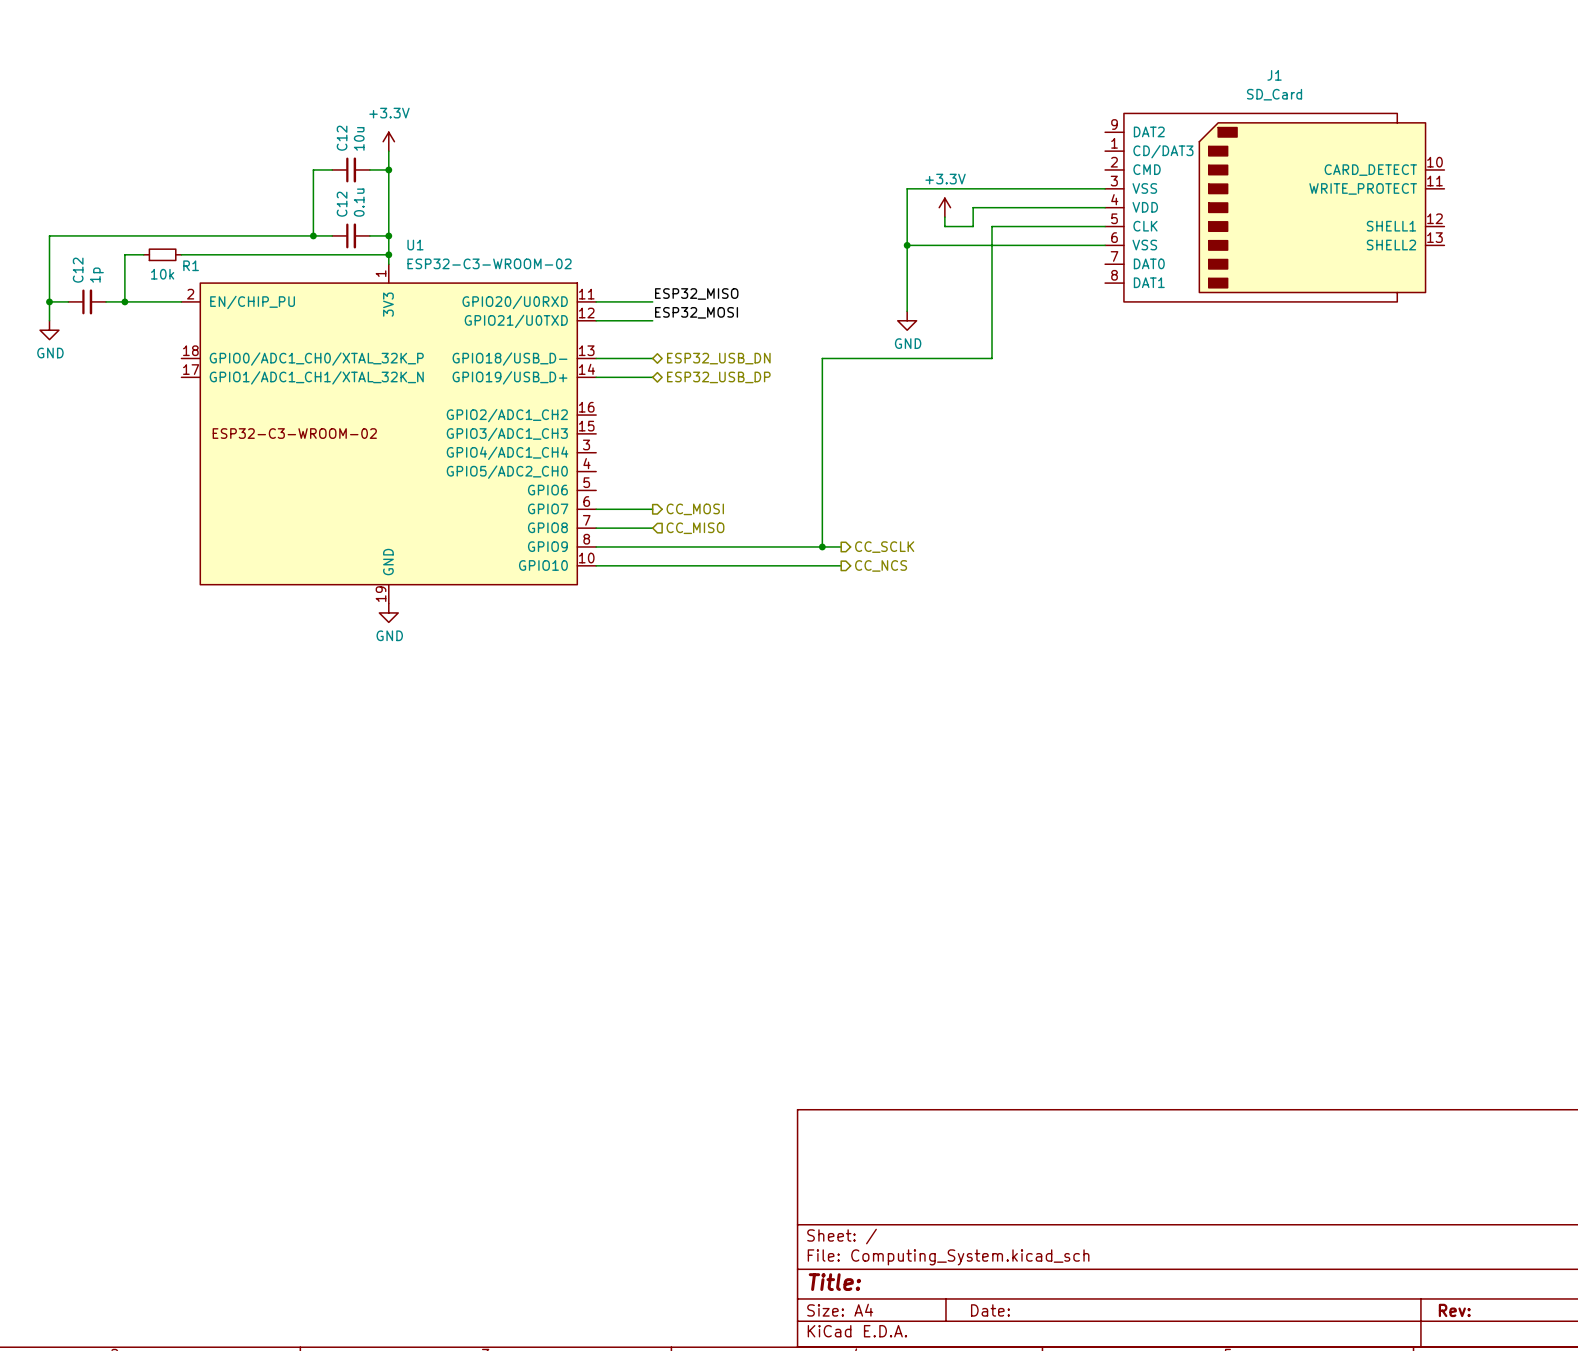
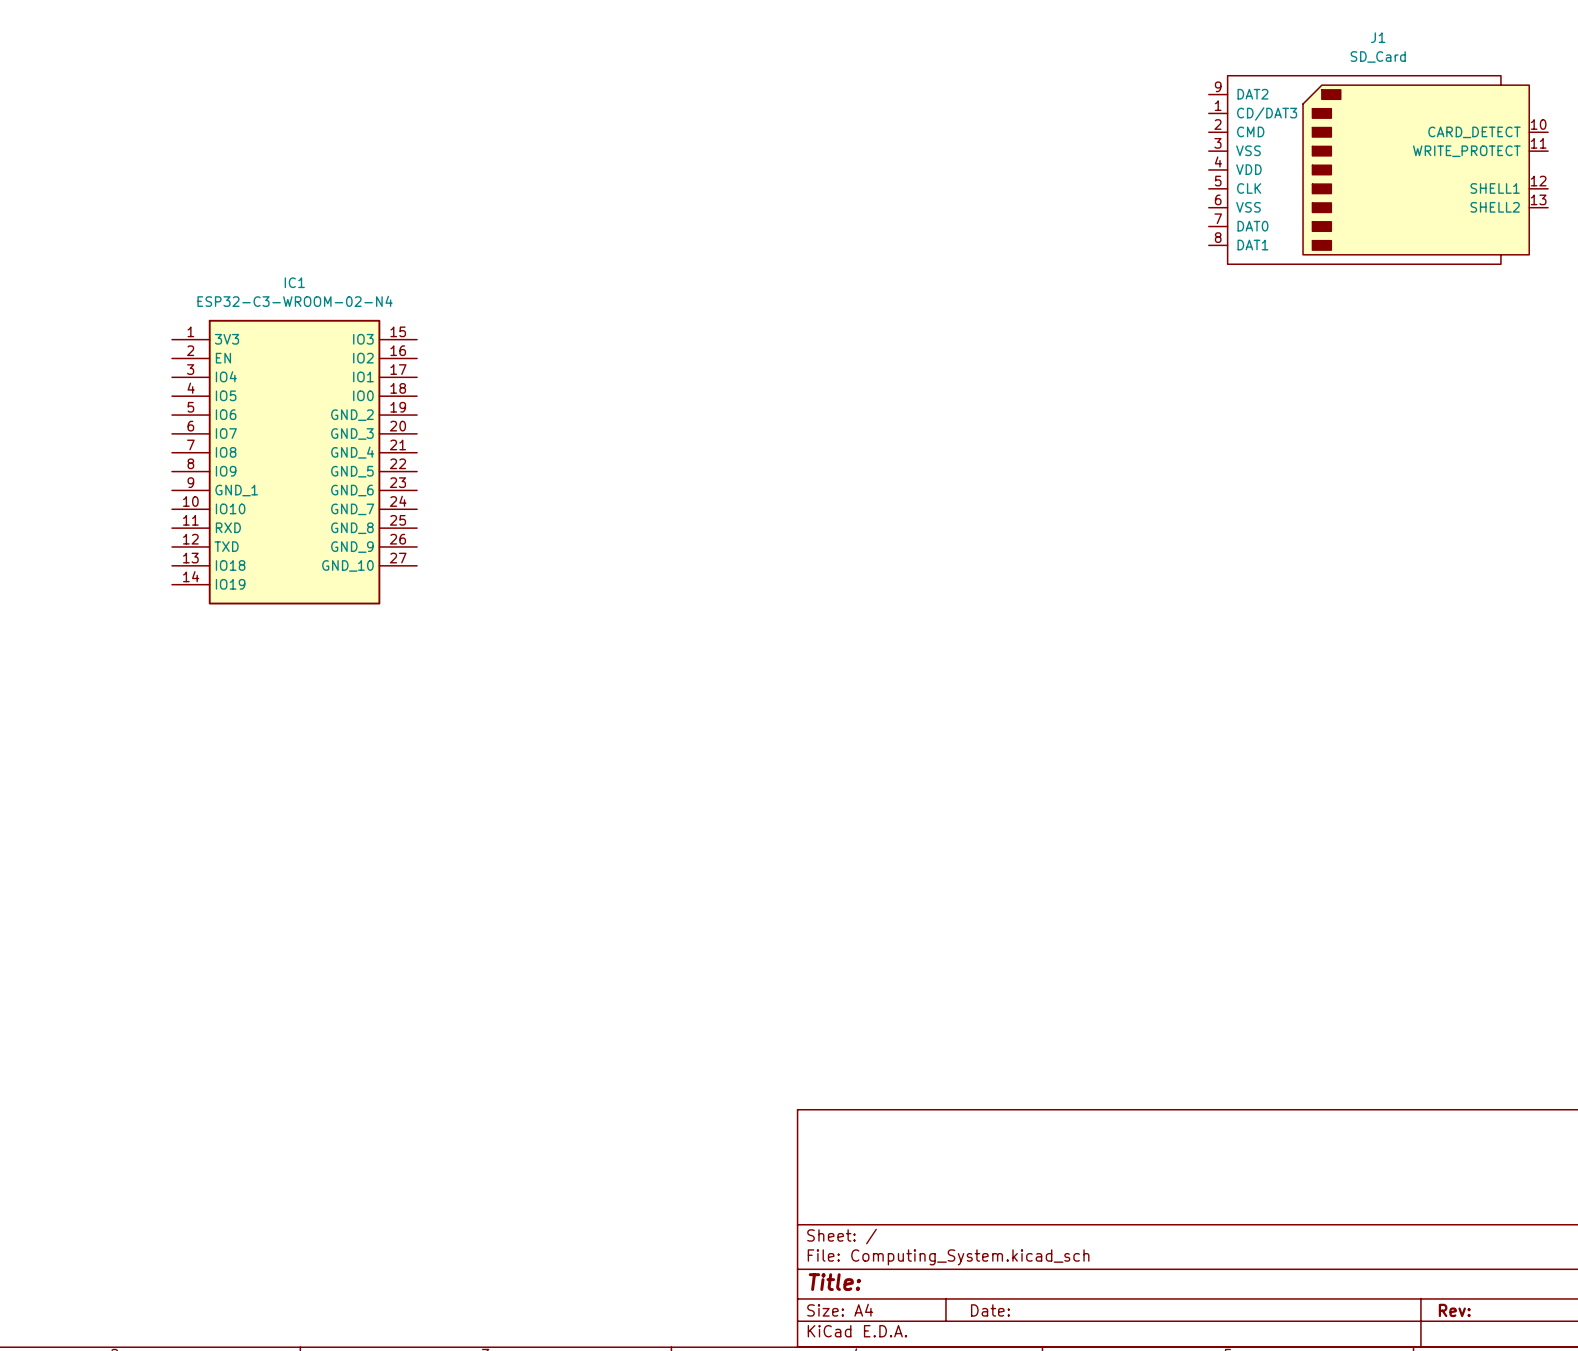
power symbol: +3.3V (388, 141) -> none
wire: (388, 151) (388, 264) -> none
wire: (332, 169) (313, 169) (313, 235) -> none
C12: 10u (351, 169) -> none
wire: (369, 169) (388, 169) -> none
junction: (388, 169) -> none
wire: (1105, 188) (907, 188) (907, 311) -> none
power symbol: +3.3V (944, 207) -> none
wire: (1105, 207) (973, 207) (973, 226) (944, 226) (944, 217) -> none
J1 position: (1274, 207) -> (1378, 169)
wire: (1105, 226) (992, 226) (992, 358) (822, 358) (822, 546) -> none
junction: (313, 235) -> none
wire: (332, 235) (49, 235) (49, 320) -> none
C12: 0.1u (351, 235) -> none
wire: (369, 235) (388, 235) -> none
junction: (388, 235) -> none
wire: (907, 245) (1105, 245) -> none
junction: (907, 245) -> none
wire: (143, 254) (124, 254) (124, 301) -> none
R1: 10k (162, 254) -> none
wire: (181, 254) (388, 254) -> none
junction: (388, 254) -> none
label: ESP32_MISO (696, 293) -> none
wire: (49, 301) (68, 301) -> none
junction: (49, 301) -> none
C12: 1p (87, 301) -> none
wire: (106, 301) (181, 301) -> none
junction: (124, 301) -> none
wire: (596, 301) (652, 301) -> none
label: ESP32_MOSI (696, 312) -> none
wire: (596, 320) (652, 320) -> none
power symbol: GND (907, 320) -> none
power symbol: GND (49, 330) -> none
wire: (596, 358) (652, 358) -> none
hierarchical label: ESP32_USB_DN (718, 358) -> none
wire: (596, 377) (652, 377) -> none
hierarchical label: ESP32_USB_DP (718, 377) -> none
U1: ESP32-C3-WROOM-02 (388, 433) -> none
IC1: none -> ESP32-C3-WROOM-02-N4 (294, 462)
wire: (596, 509) (652, 509) -> none
hierarchical label: CC_MOSI (695, 509) -> none
wire: (596, 528) (652, 528) -> none
hierarchical label: CC_MISO (695, 528) -> none
wire: (596, 546) (841, 546) -> none
junction: (822, 546) -> none
hierarchical label: CC_SCLK (884, 547) -> none
wire: (596, 565) (841, 565) -> none
hierarchical label: CC_NCS (881, 565) -> none
power symbol: GND (388, 612) -> none

